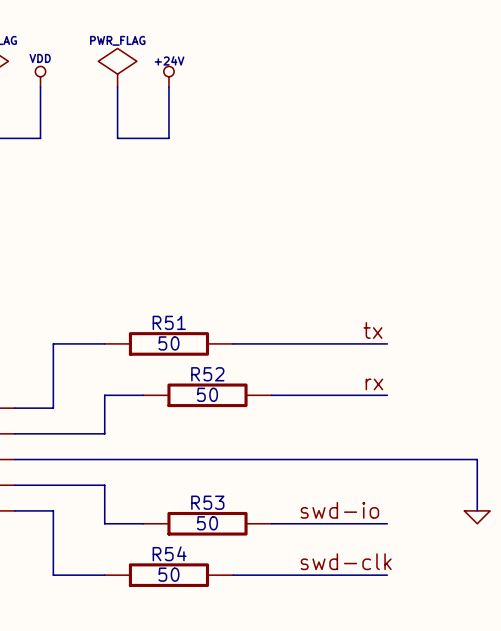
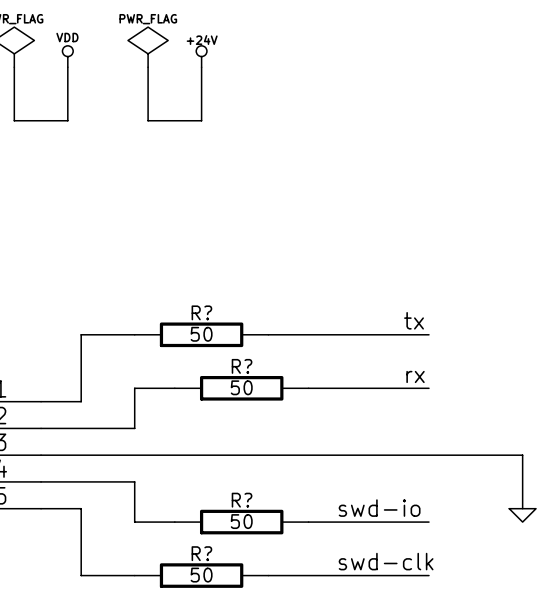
R51 name: R51 (169, 322) -> R? (201, 312)
R52 name: R52 (207, 374) -> R? (242, 366)
R53 name: R53 (207, 502) -> R? (242, 500)
R54 name: R54 (169, 553) -> R? (201, 553)

